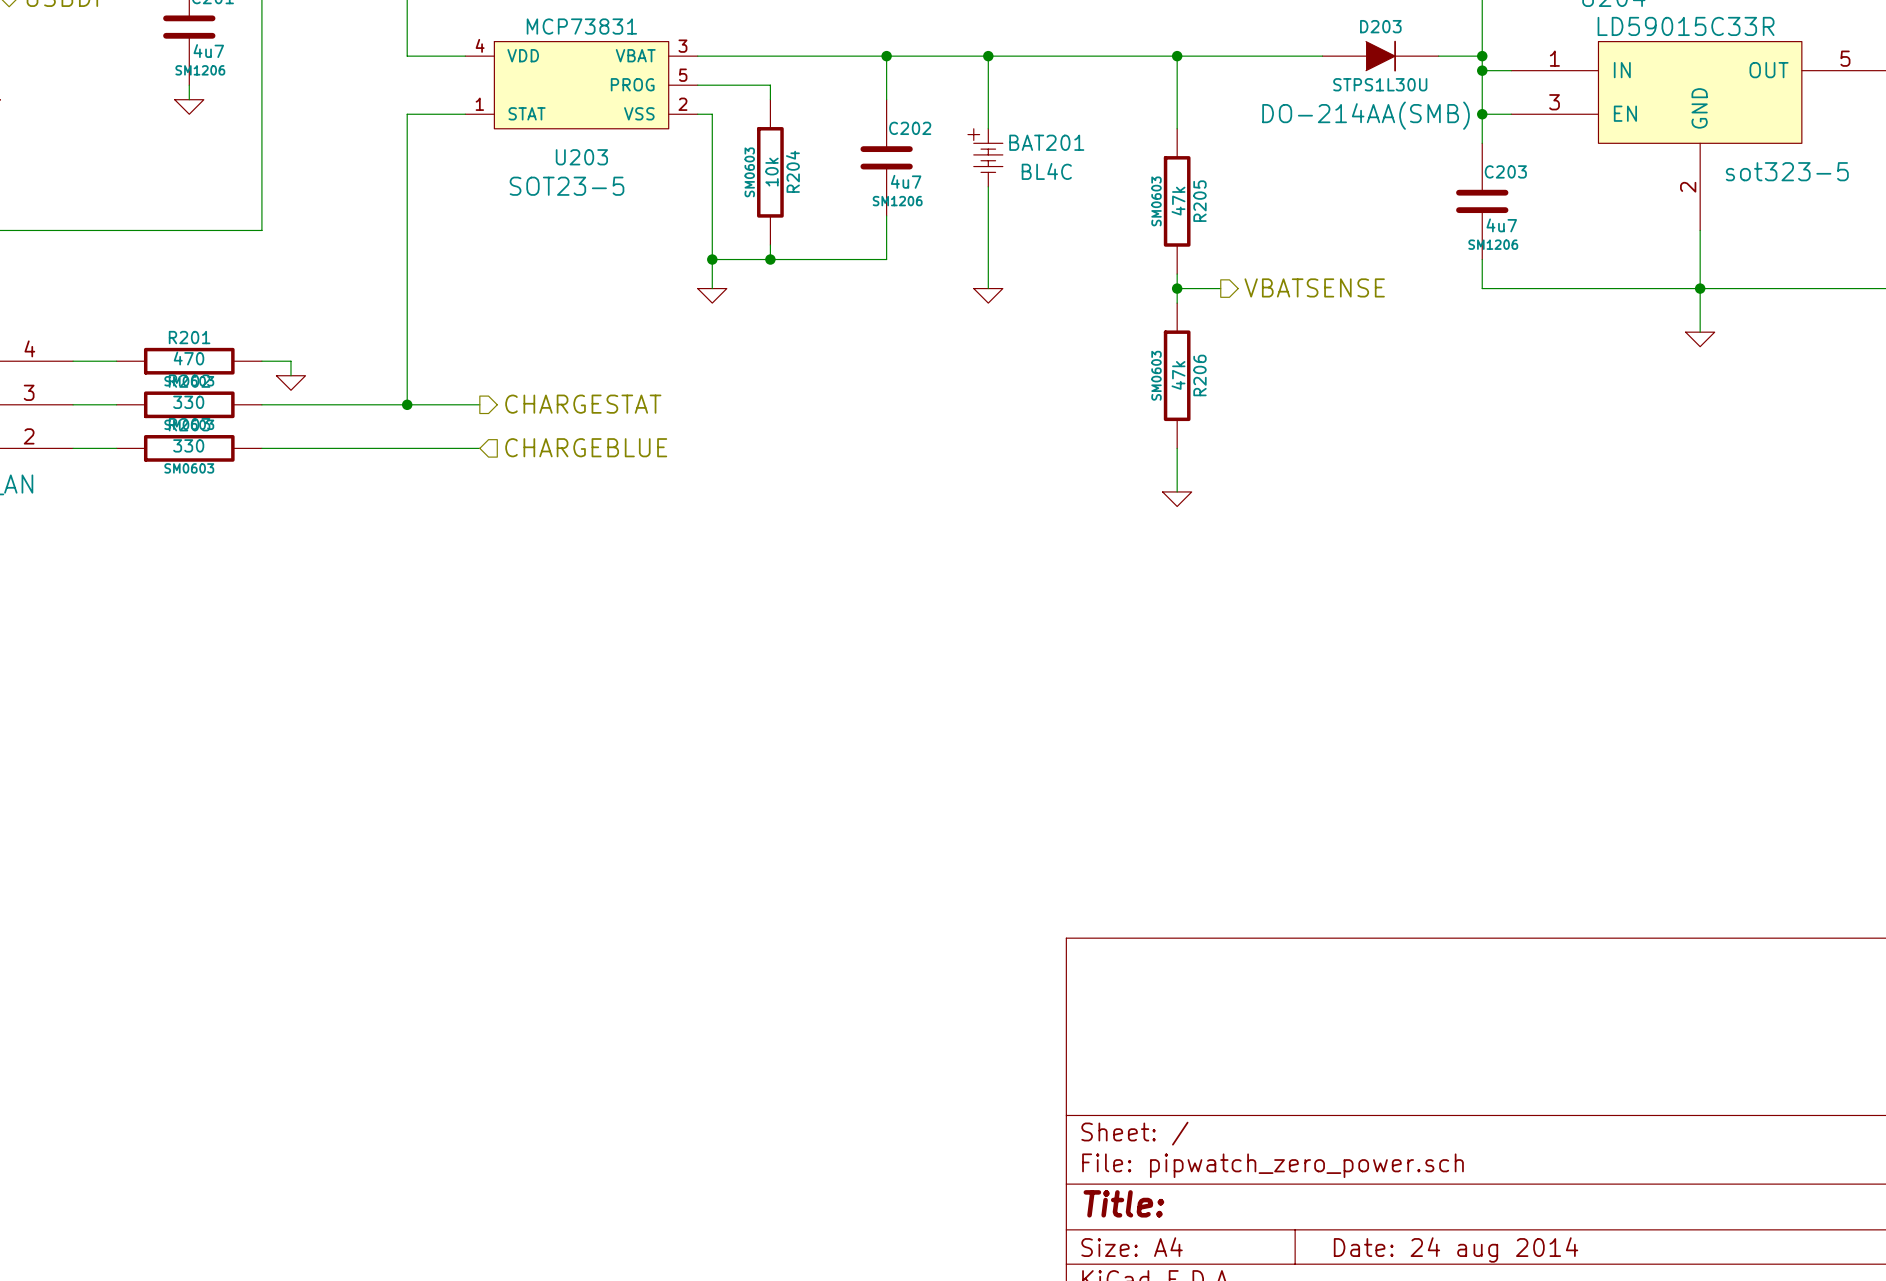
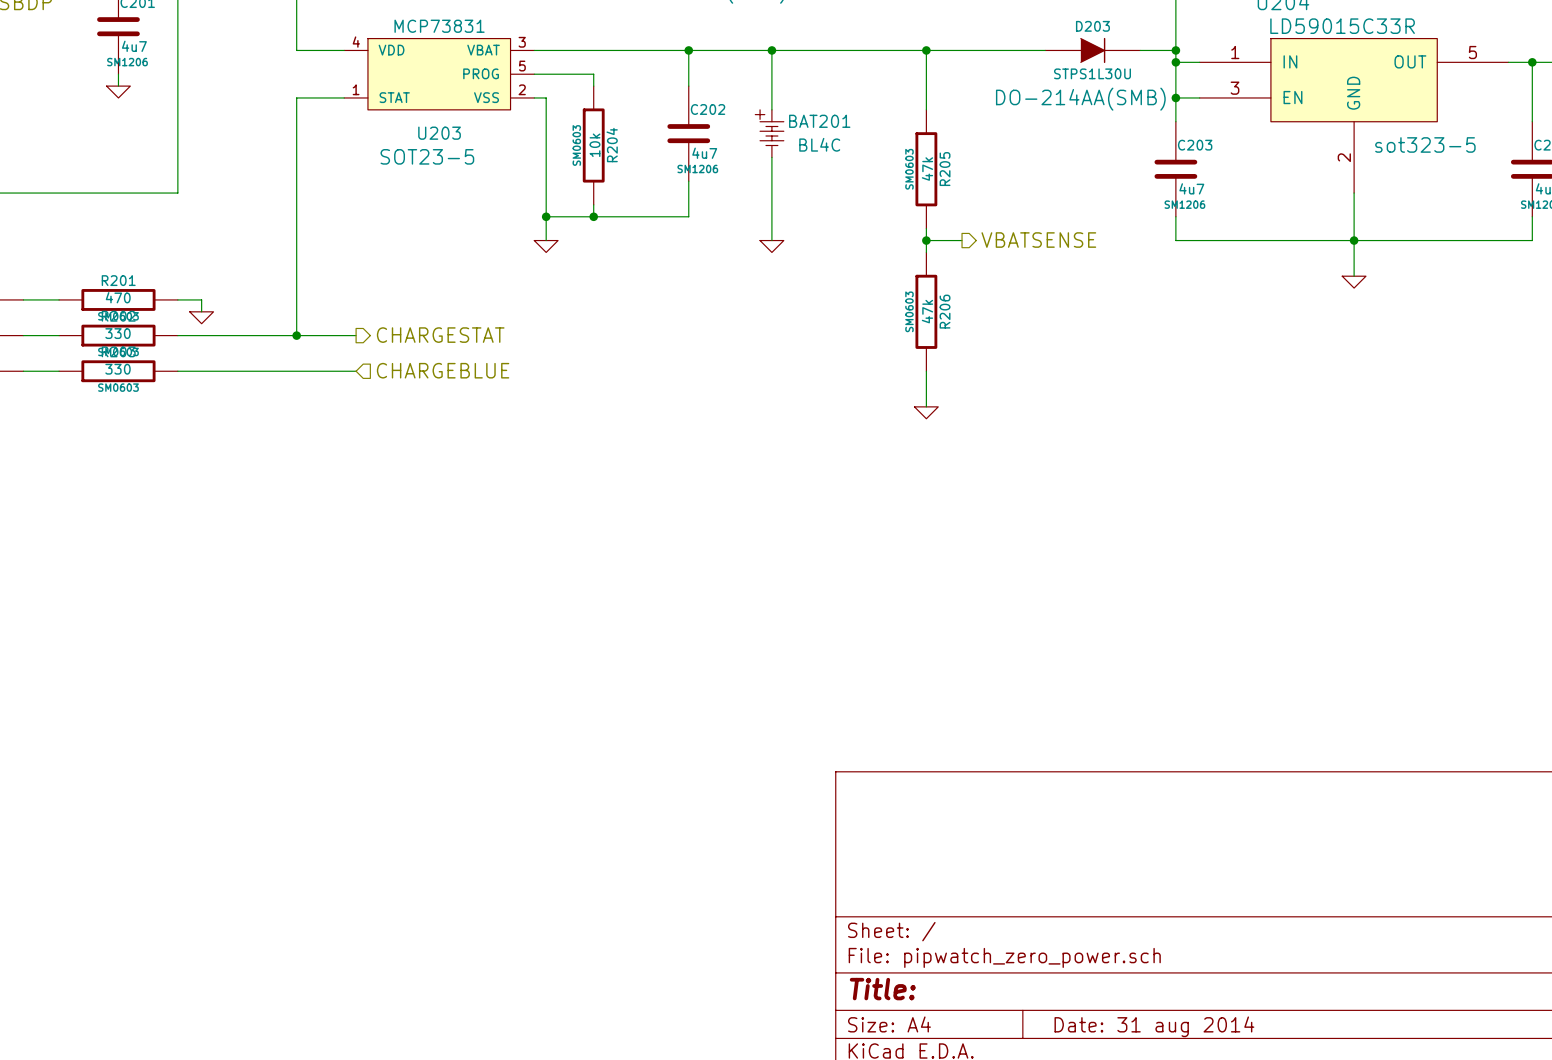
title block: Date: 24 aug 2014 (1456, 1249) -> Date: 31 aug 2014 (1154, 1026)

